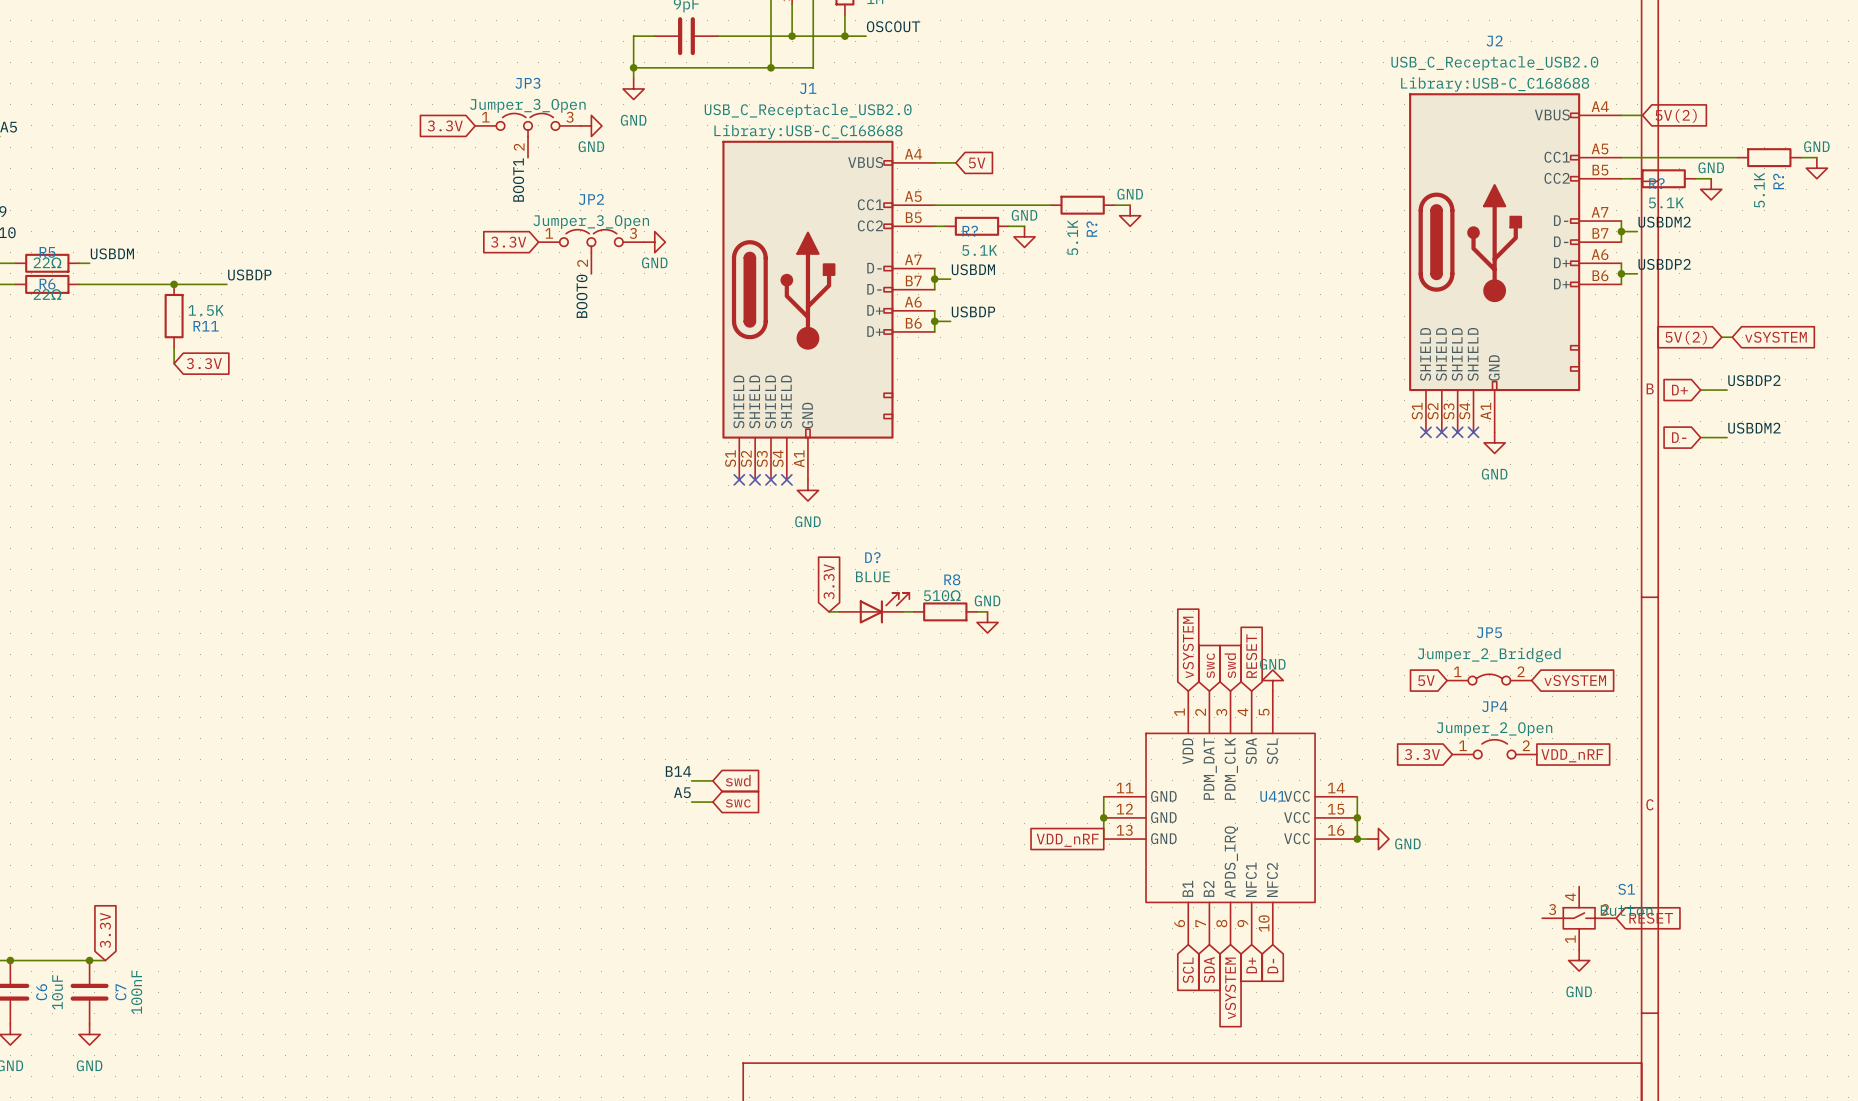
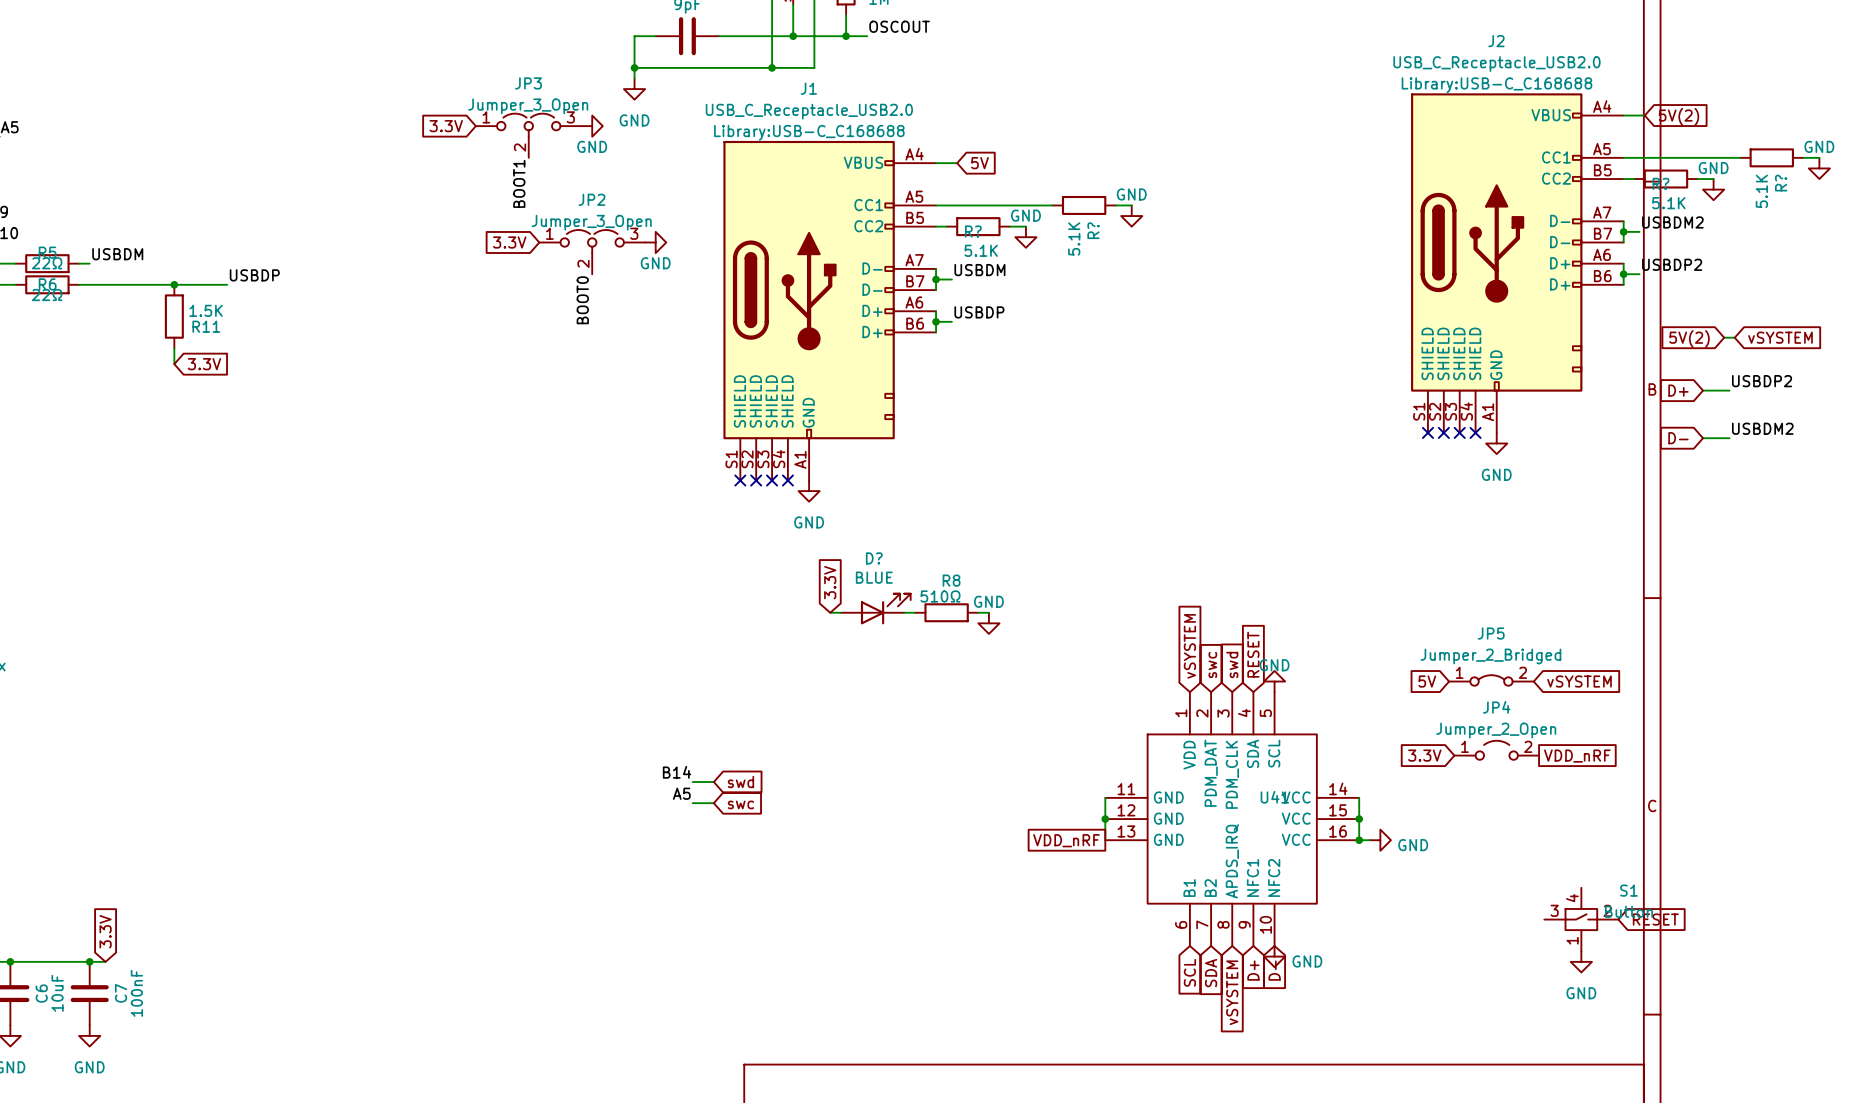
power symbol: none -> GND (1274, 956)

